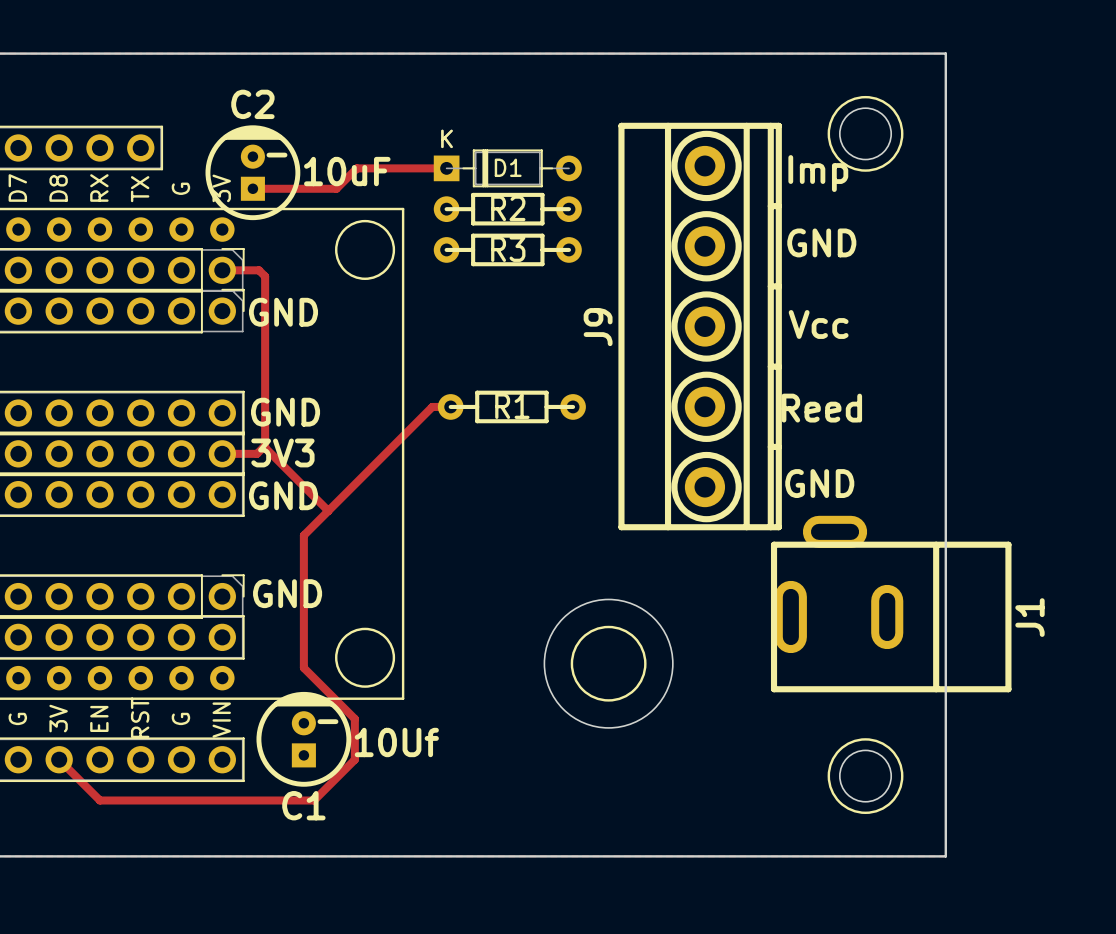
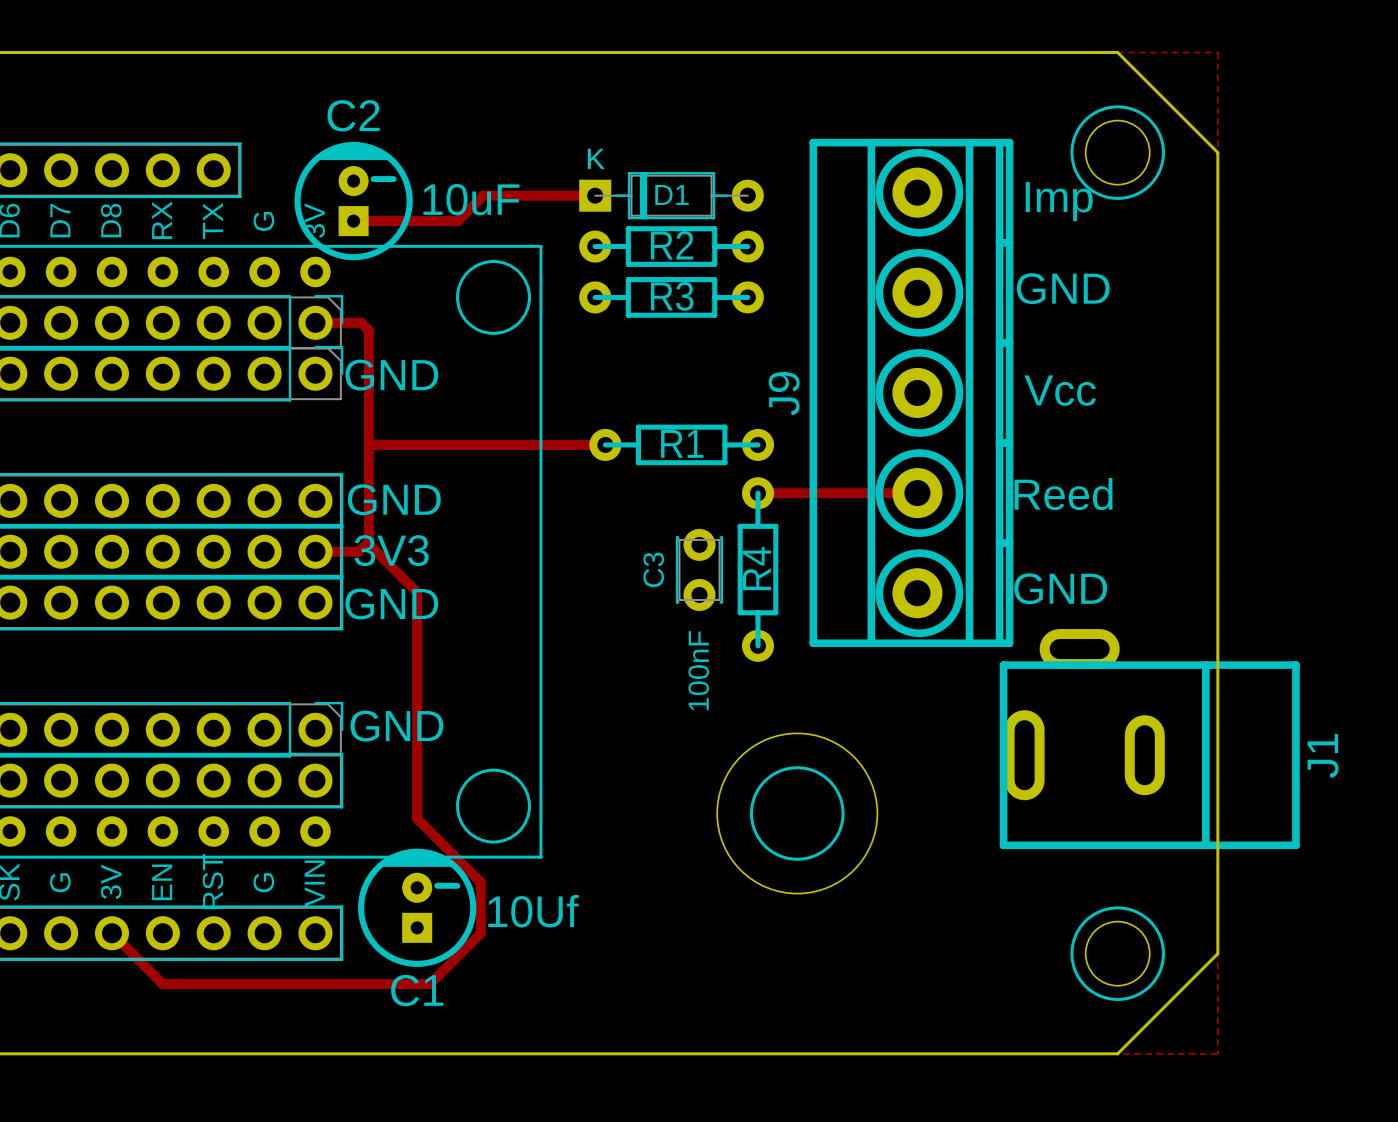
board edge: (865, 53) (945, 53) (945, 133) -> (1117, 52) (1217, 152)
track: none -> (605, 444) (371, 444) (368, 447)
track: (450, 406) (432, 406) (303, 535) -> none
R1 position: (511, 406) -> (681, 444)
track: none -> (757, 493) (917, 493)
C3: none -> 100nF (699, 569)
R4: none -> (757, 569)
track: (303, 486) (328, 510) -> (417, 592) (417, 653)
board edge: (945, 776) (945, 856) (865, 856) -> (1217, 953) (1117, 1053)

